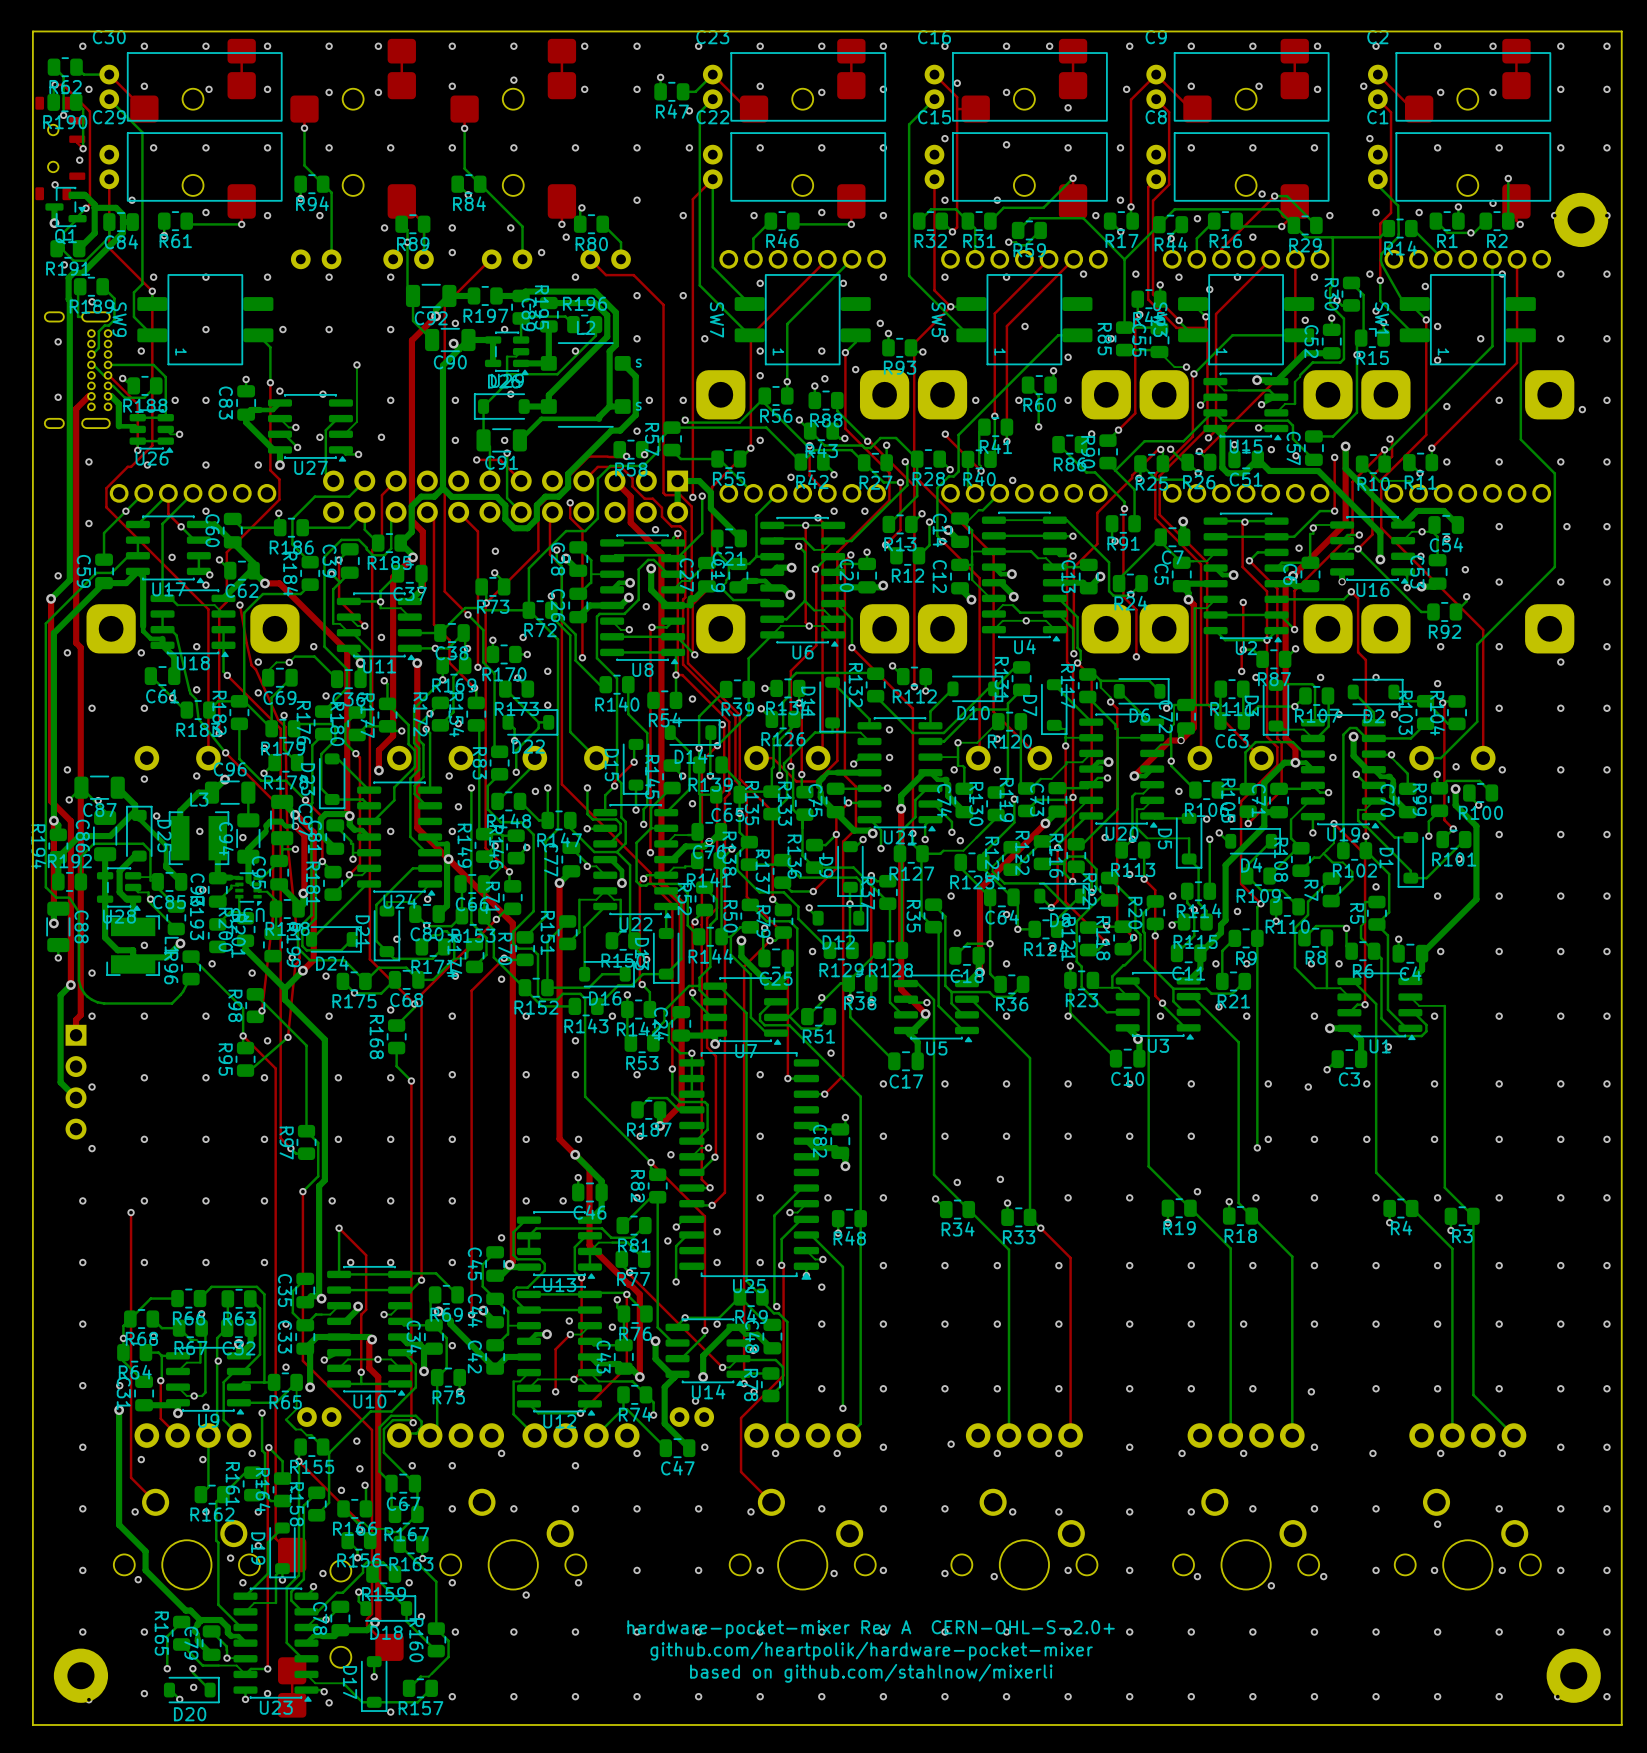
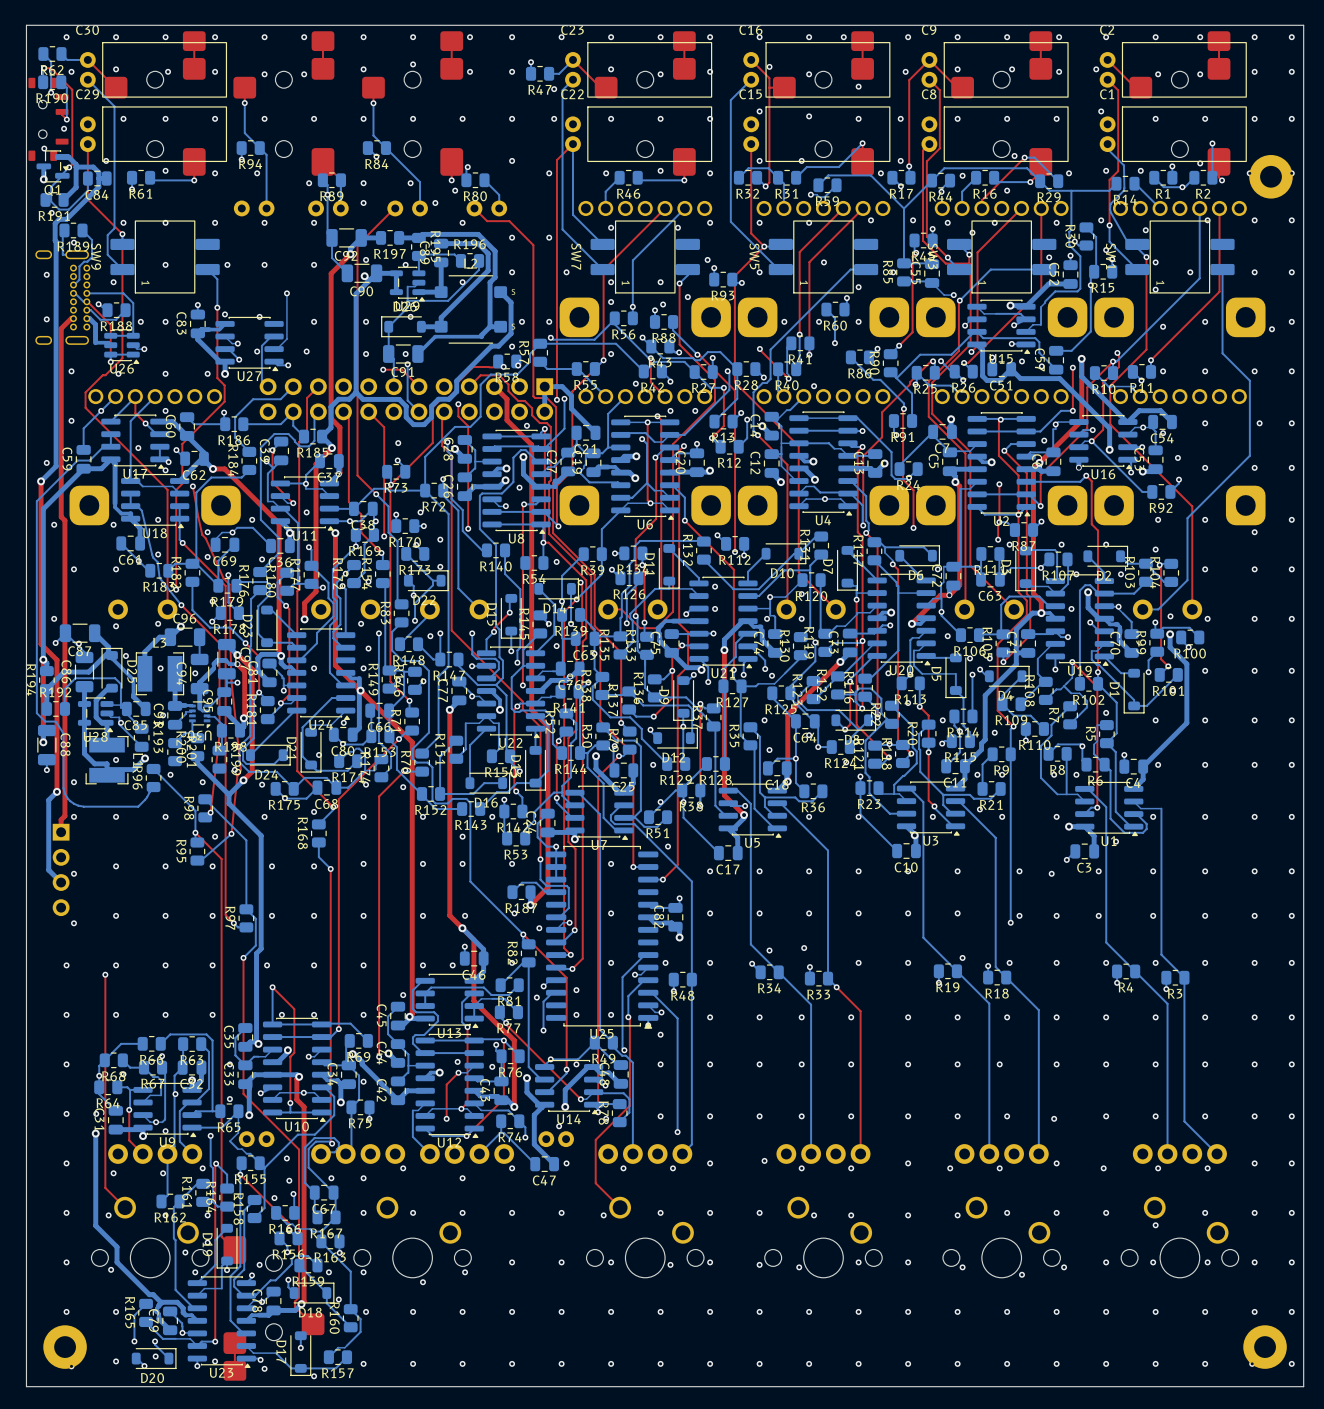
text: hardware-pocket-mixer Rev A CERN-OHL-S-2.0+ (871, 1629) -> none
text: github.com/heartpolik/hardware-pocket-mixer (871, 1651) -> none
text: based on github.com/stahlnow/mixerli (871, 1673) -> none

